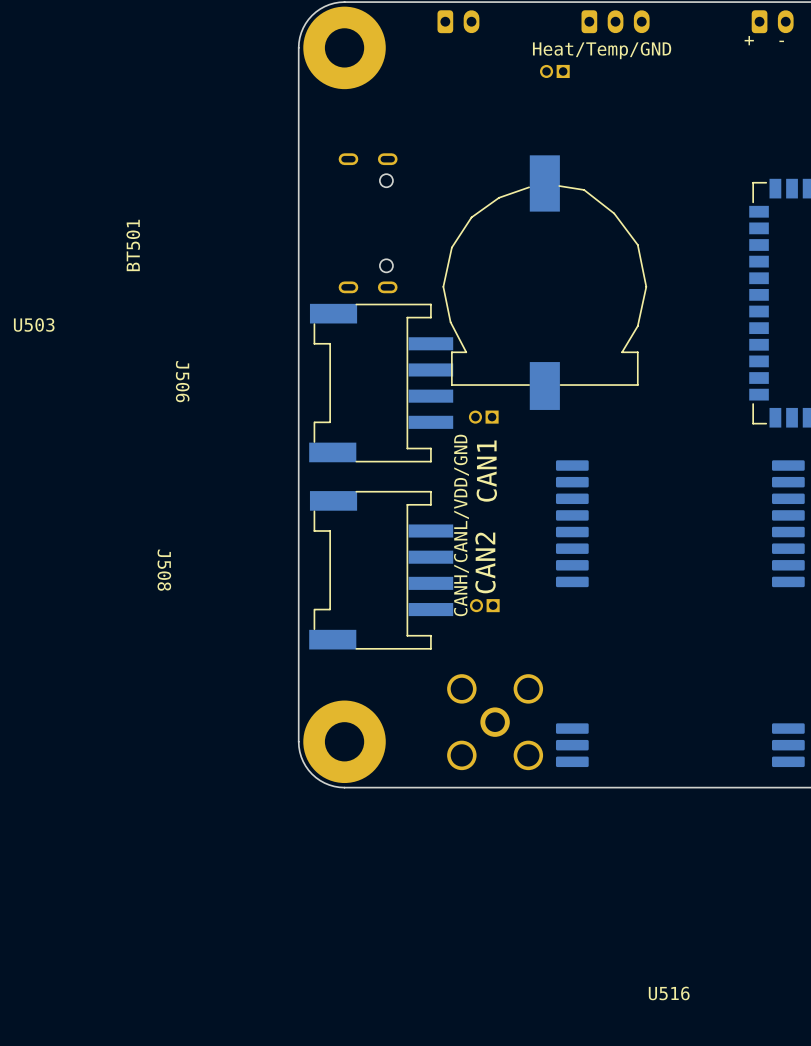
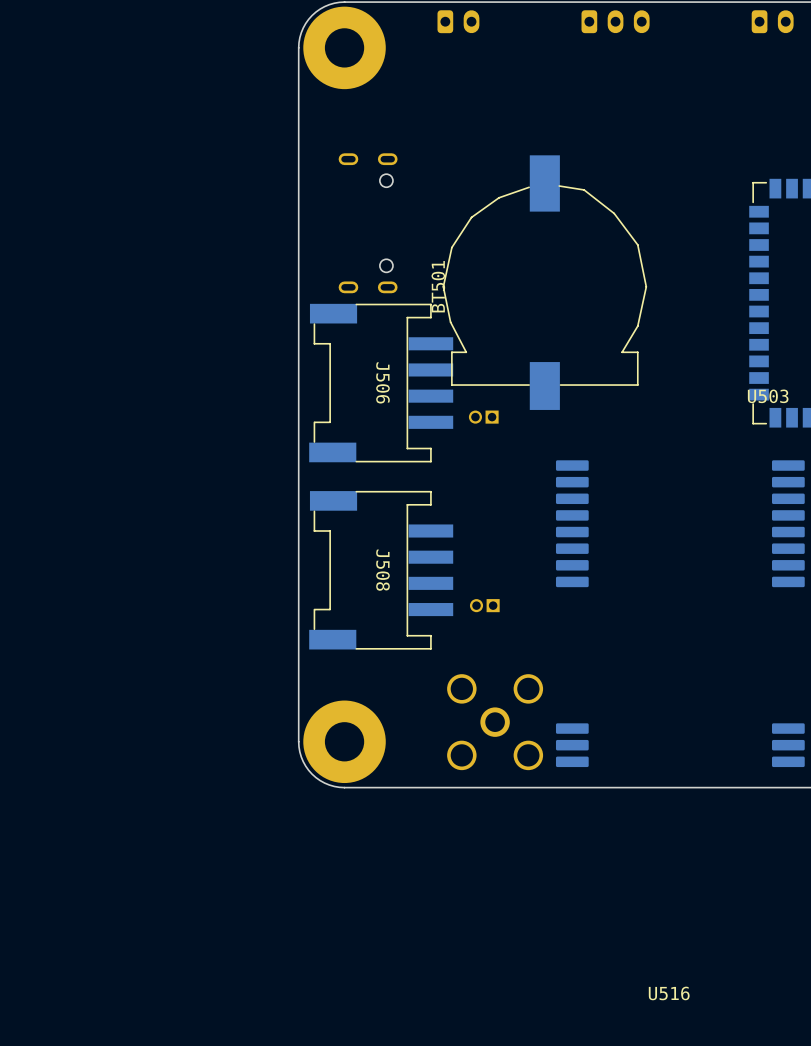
text: + - (764, 40) -> none
text: Heat/Temp/GND (602, 50) -> none
part: (554, 71) -> none
BT501 name position: BT501 (133, 245) -> BT501 (438, 286)
U503 name position: U503 (34, 324) -> U503 (768, 396)
J506 name position: J506 (182, 381) -> J506 (382, 382)
text: CAN1 (486, 471) -> none
text: CANH/CANL/VDD/GND (461, 525) -> none
text: CAN2 (485, 562) -> none
J508 name position: J508 (164, 570) -> J508 (382, 570)

